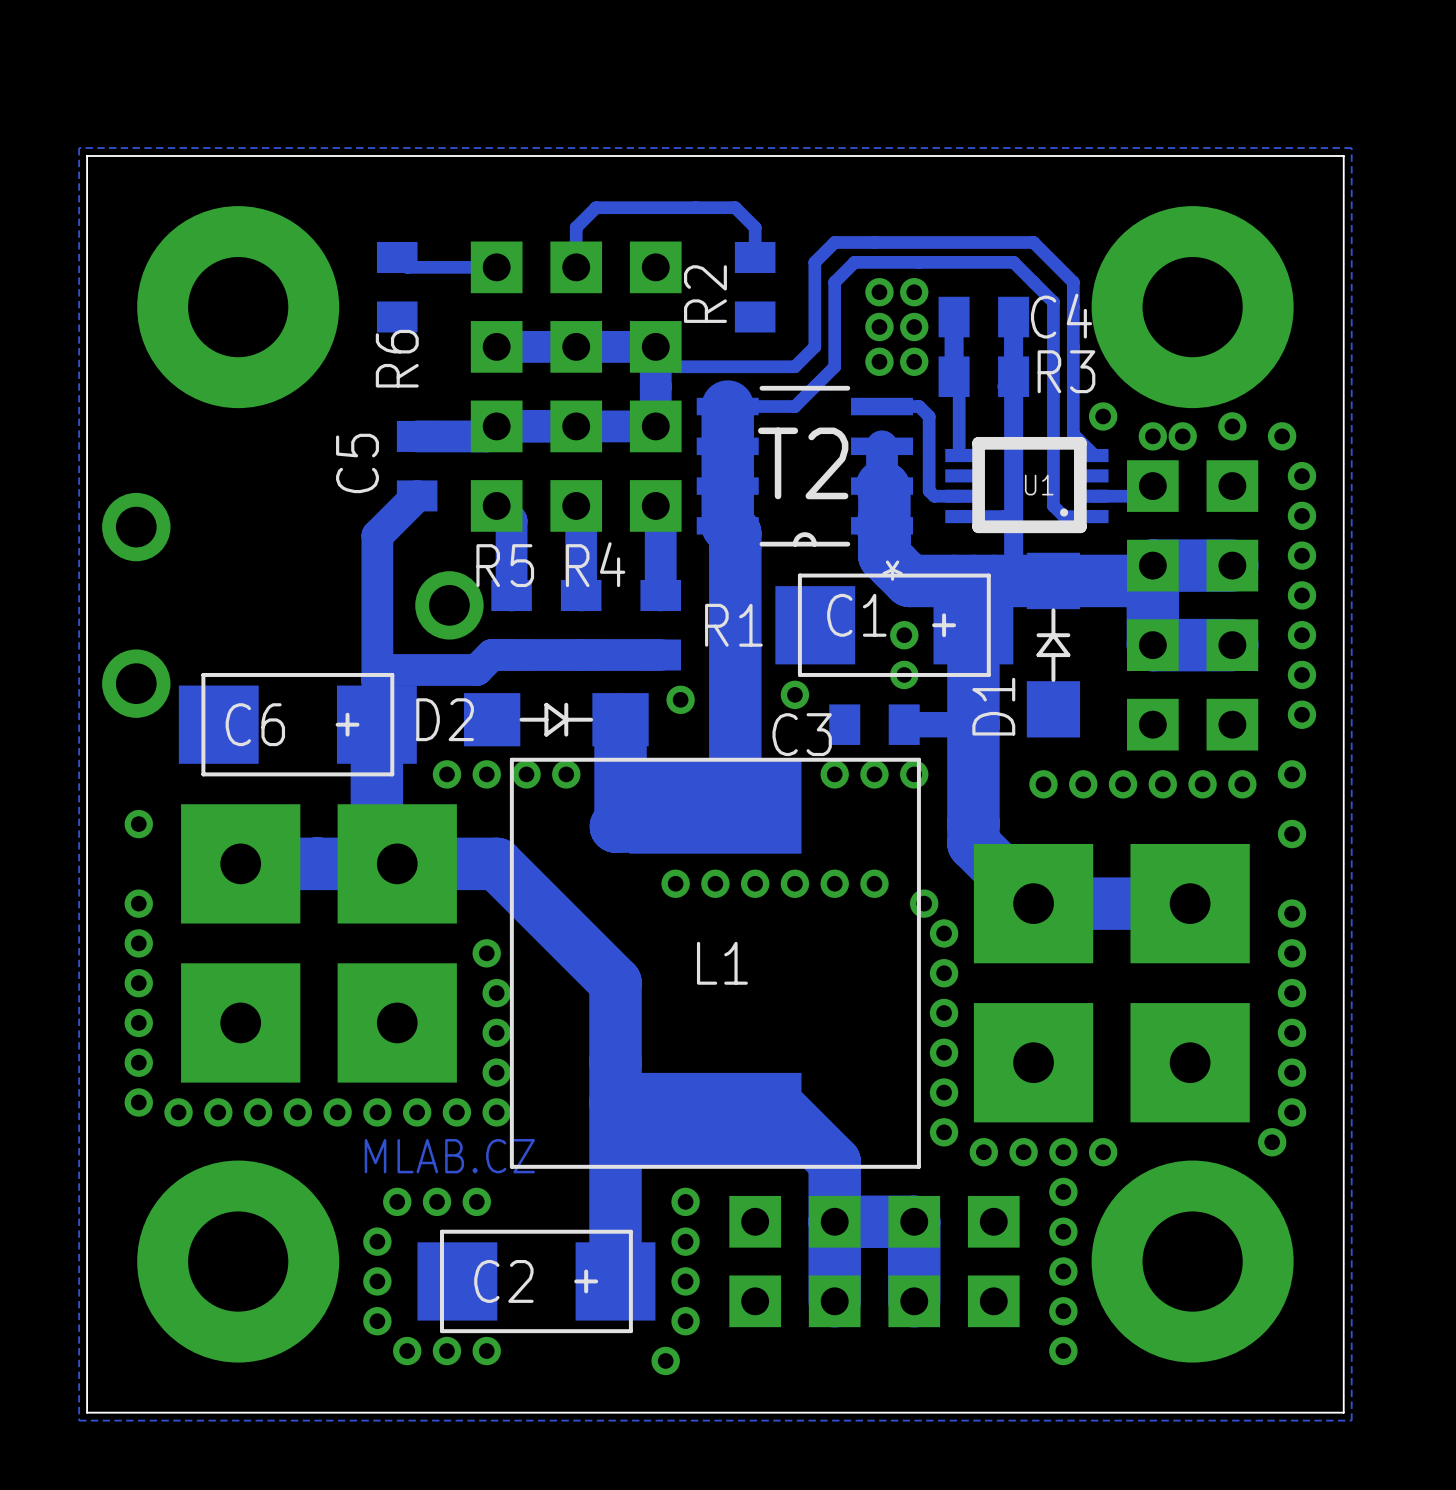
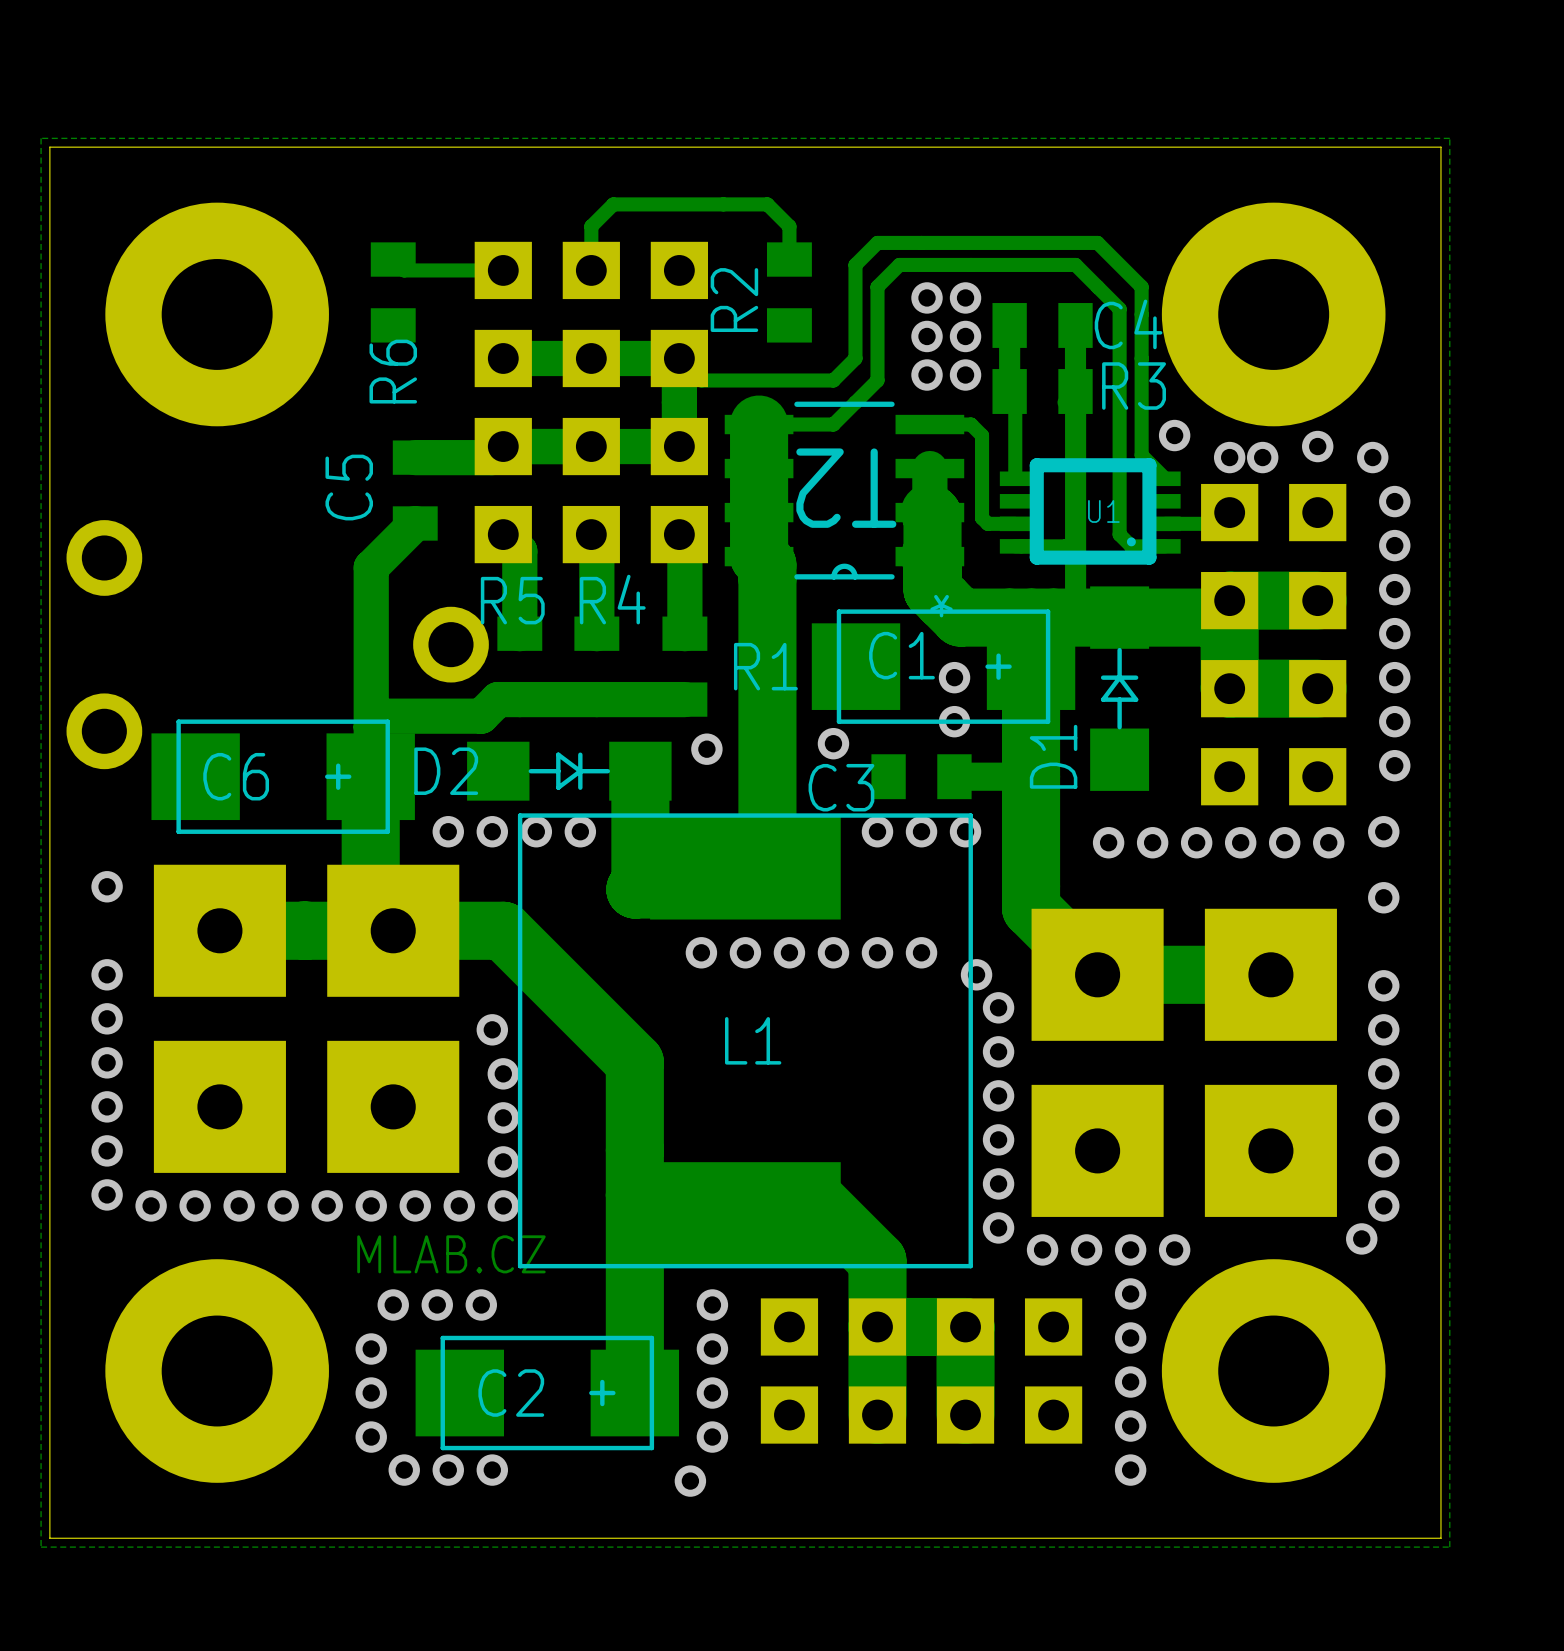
T2 name rotation: 0° (803, 463) -> 180° (846, 488)

